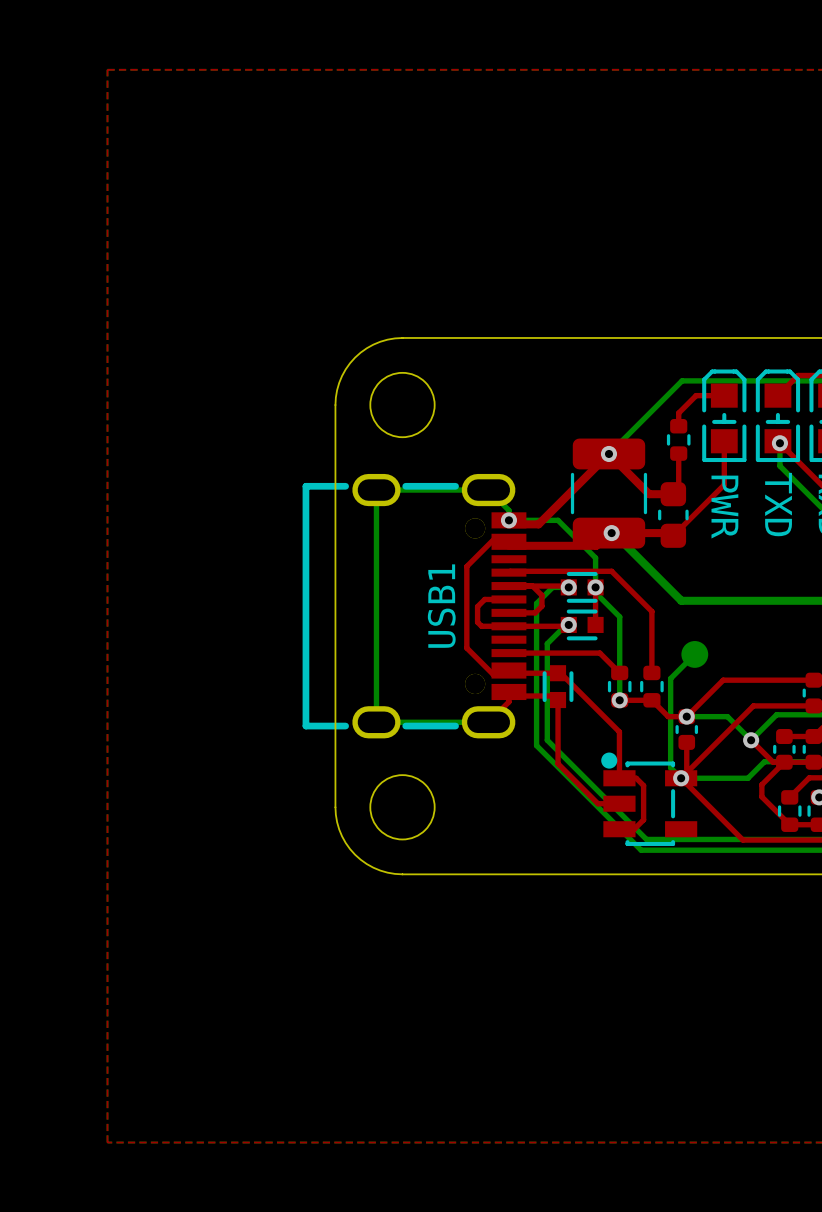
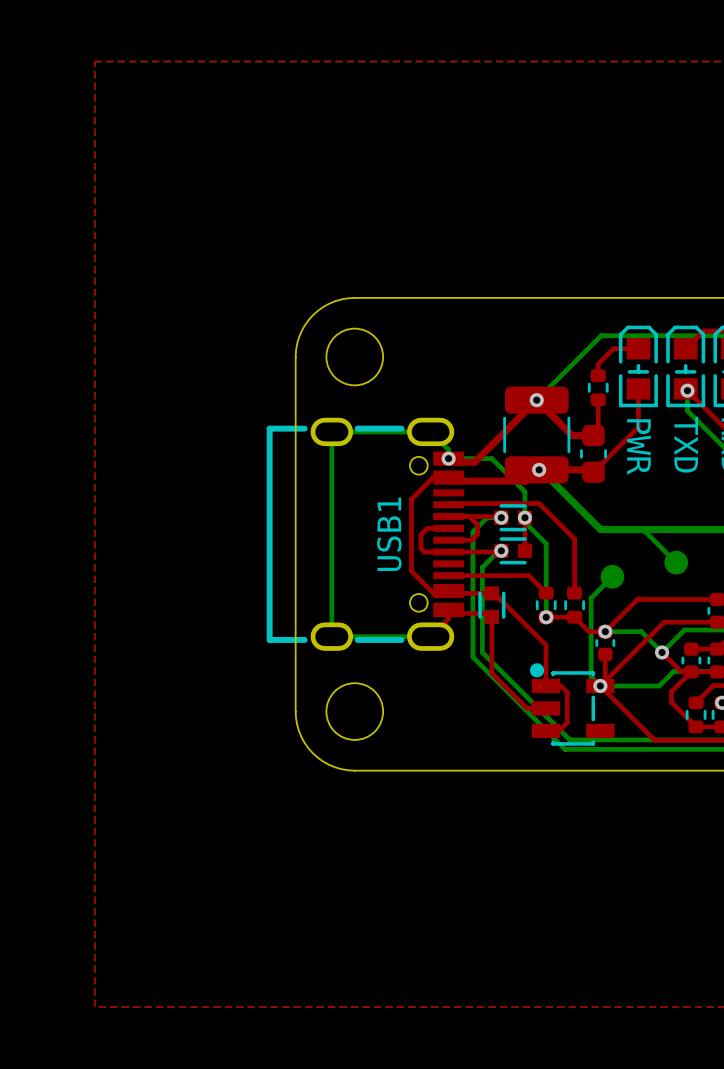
USB1 footprint: [302, 473, 527, 739] -> [266, 417, 464, 651]
bottom track: none -> (643, 529) (676, 562)
part: none -> (676, 562)

